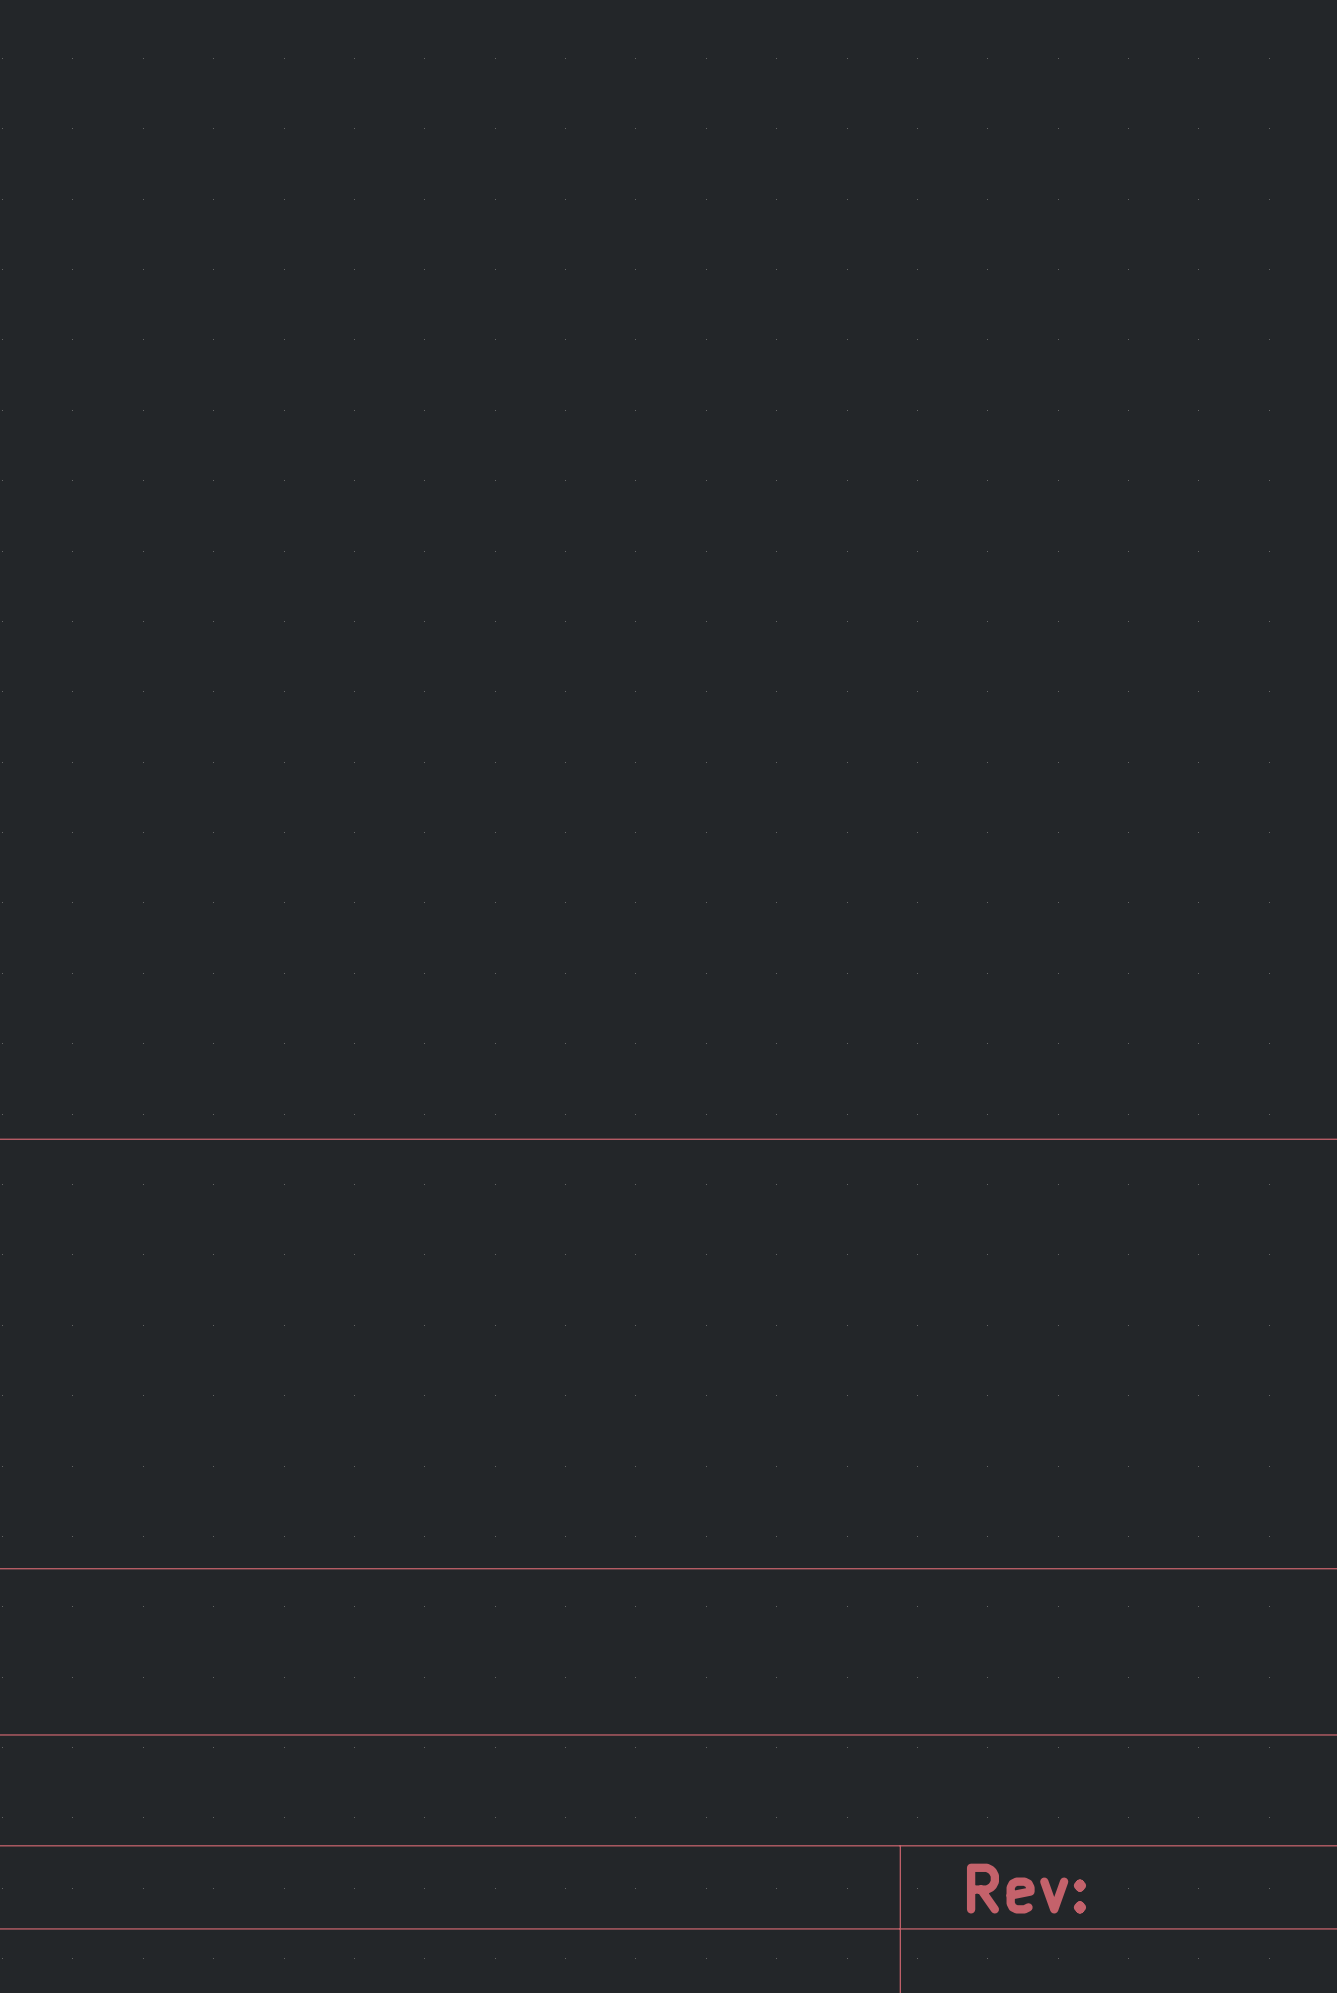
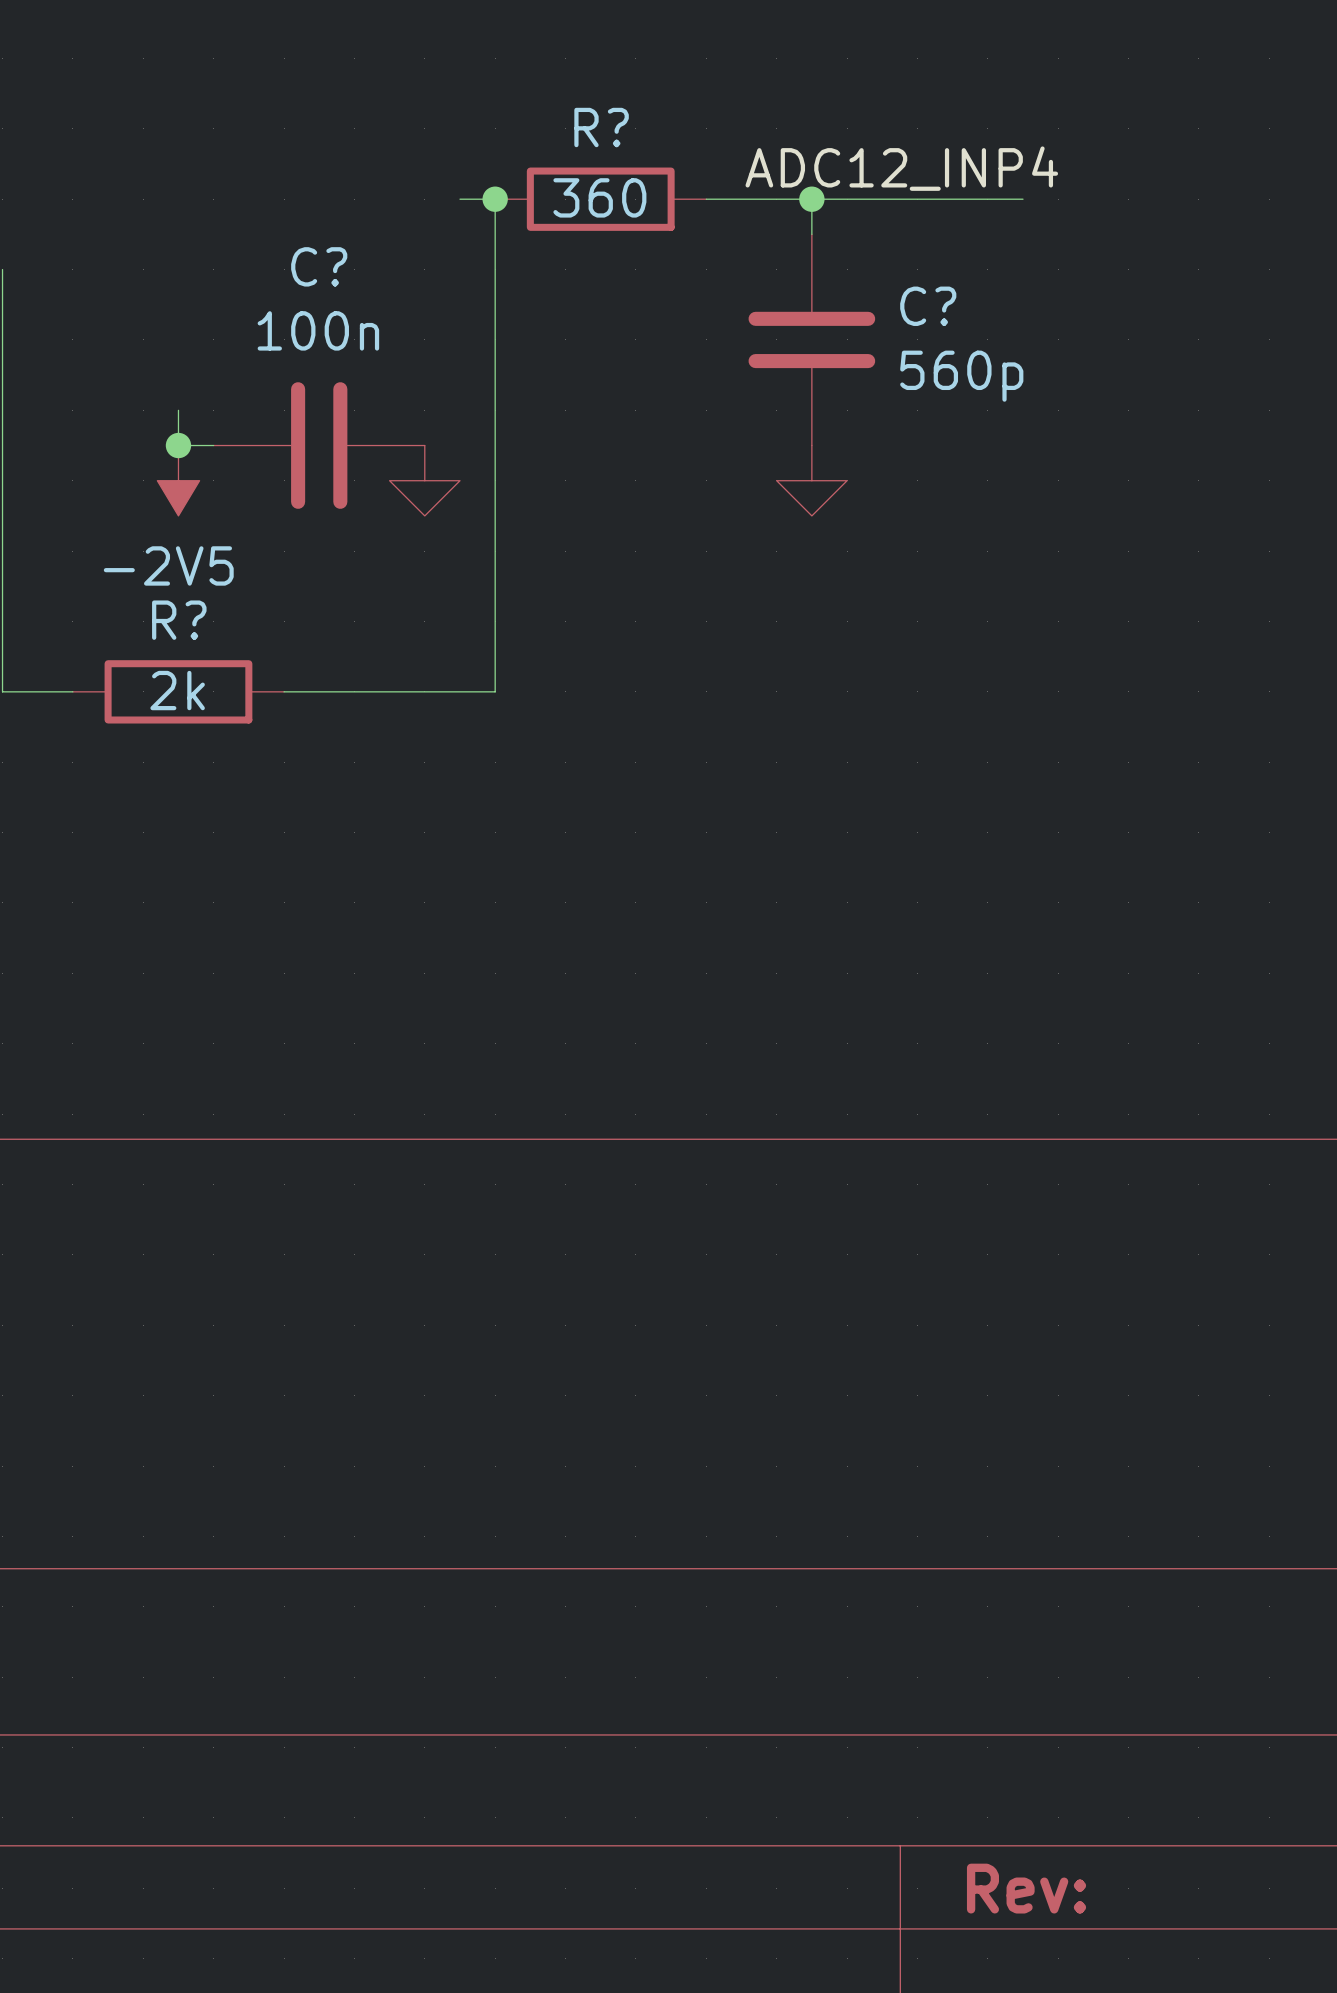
label: none -> ADC12_INP4 (901, 168)
wire: none -> (459, 199) (495, 199) (495, 691) (284, 691)
junction: none -> (495, 199)
R?: none -> 360 (600, 199)
wire: none -> (706, 199) (1023, 199)
wire: none -> (811, 199) (811, 234)
junction: none -> (811, 199)
wire: none -> (2, 269) (2, 691) (72, 691)
C?: none -> 560p (811, 339)
wire: none -> (178, 410) (178, 445) (213, 445)
junction: none -> (178, 445)
C?: none -> 100n (319, 445)
power symbol: none -> -2V5 (178, 480)
power symbol: none -> (424, 480)
power symbol: none -> (811, 480)
R?: none -> 2k (178, 691)

